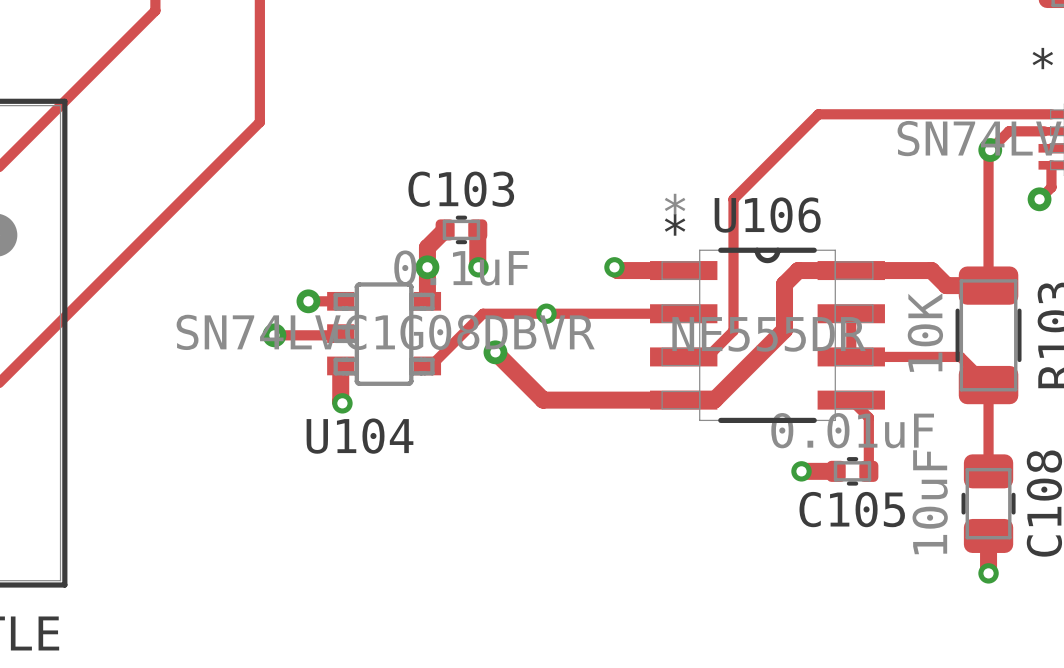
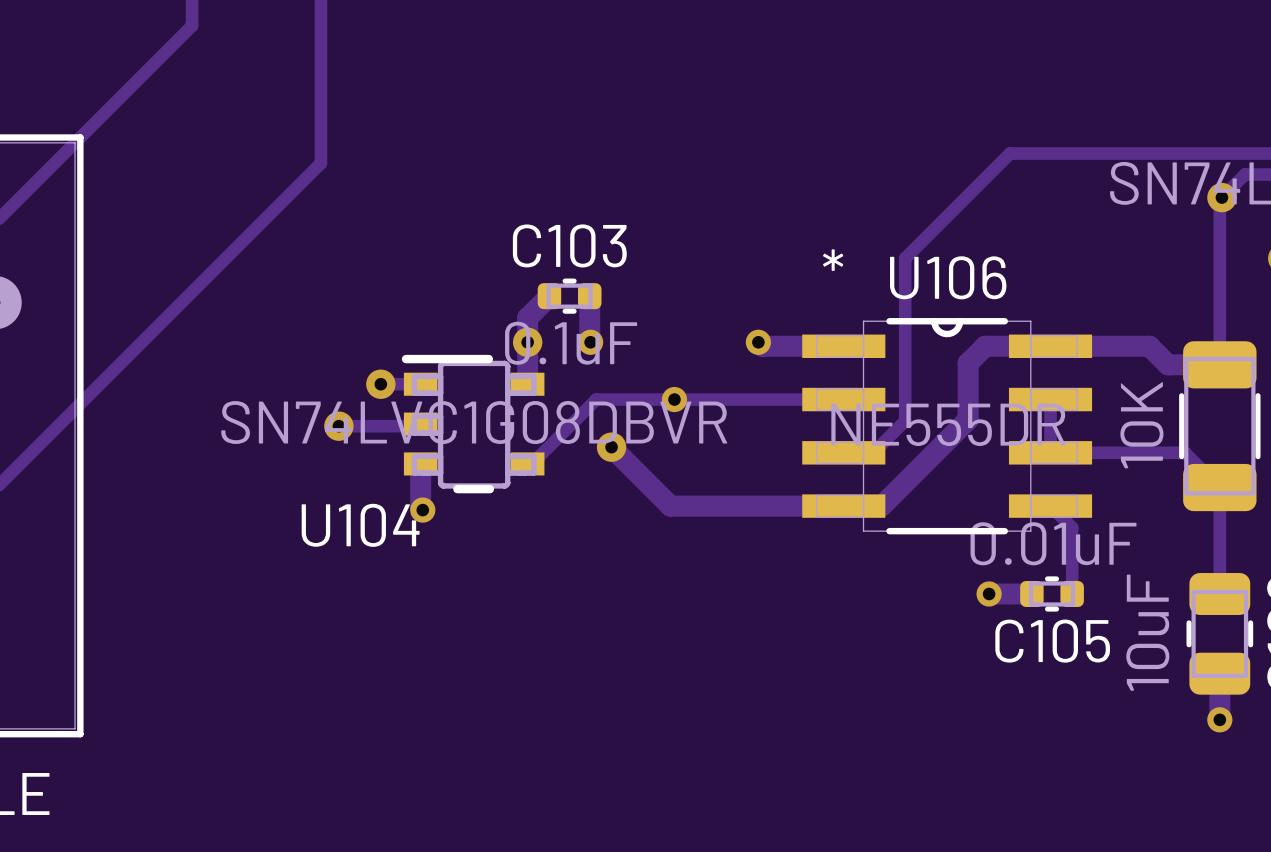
U106 footprint: [650, 247, 885, 424] -> [802, 318, 1093, 535]
U104 footprint: [327, 282, 442, 386] -> [401, 354, 545, 494]
U104 name position: U104 (359, 436) -> U104 (360, 525)

